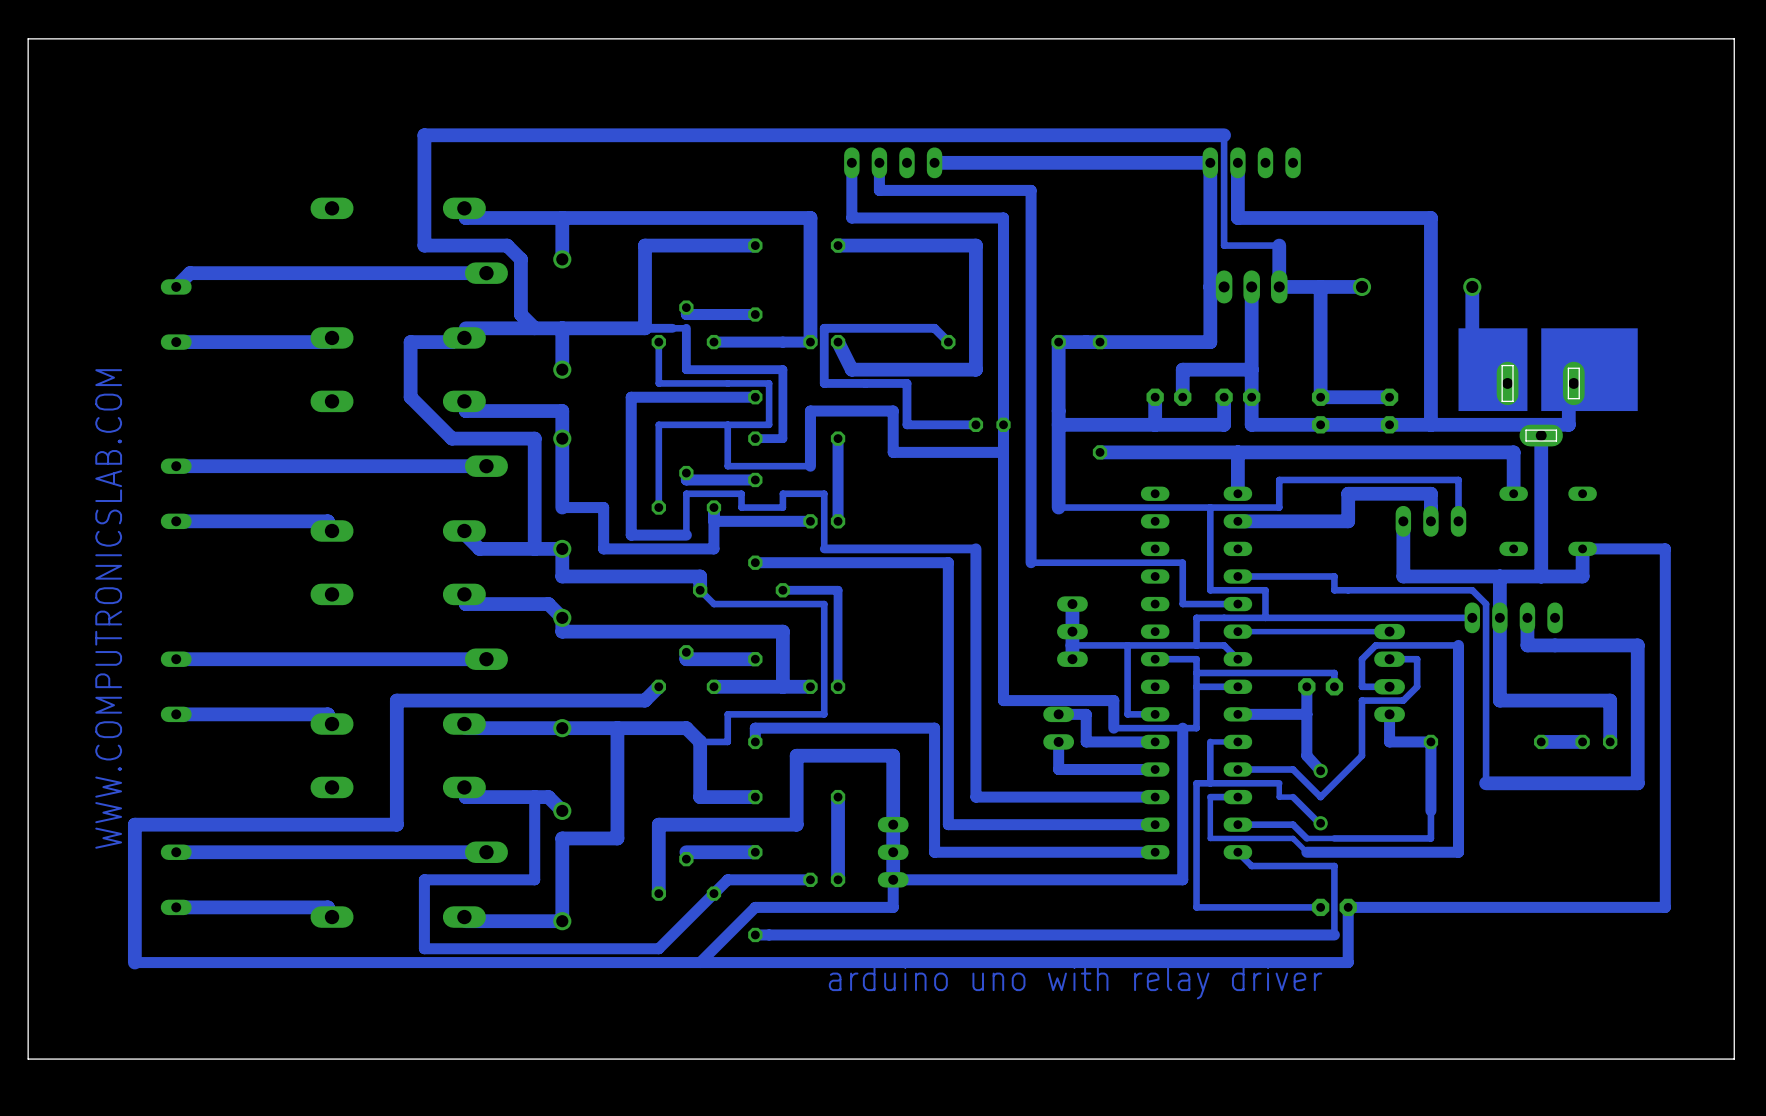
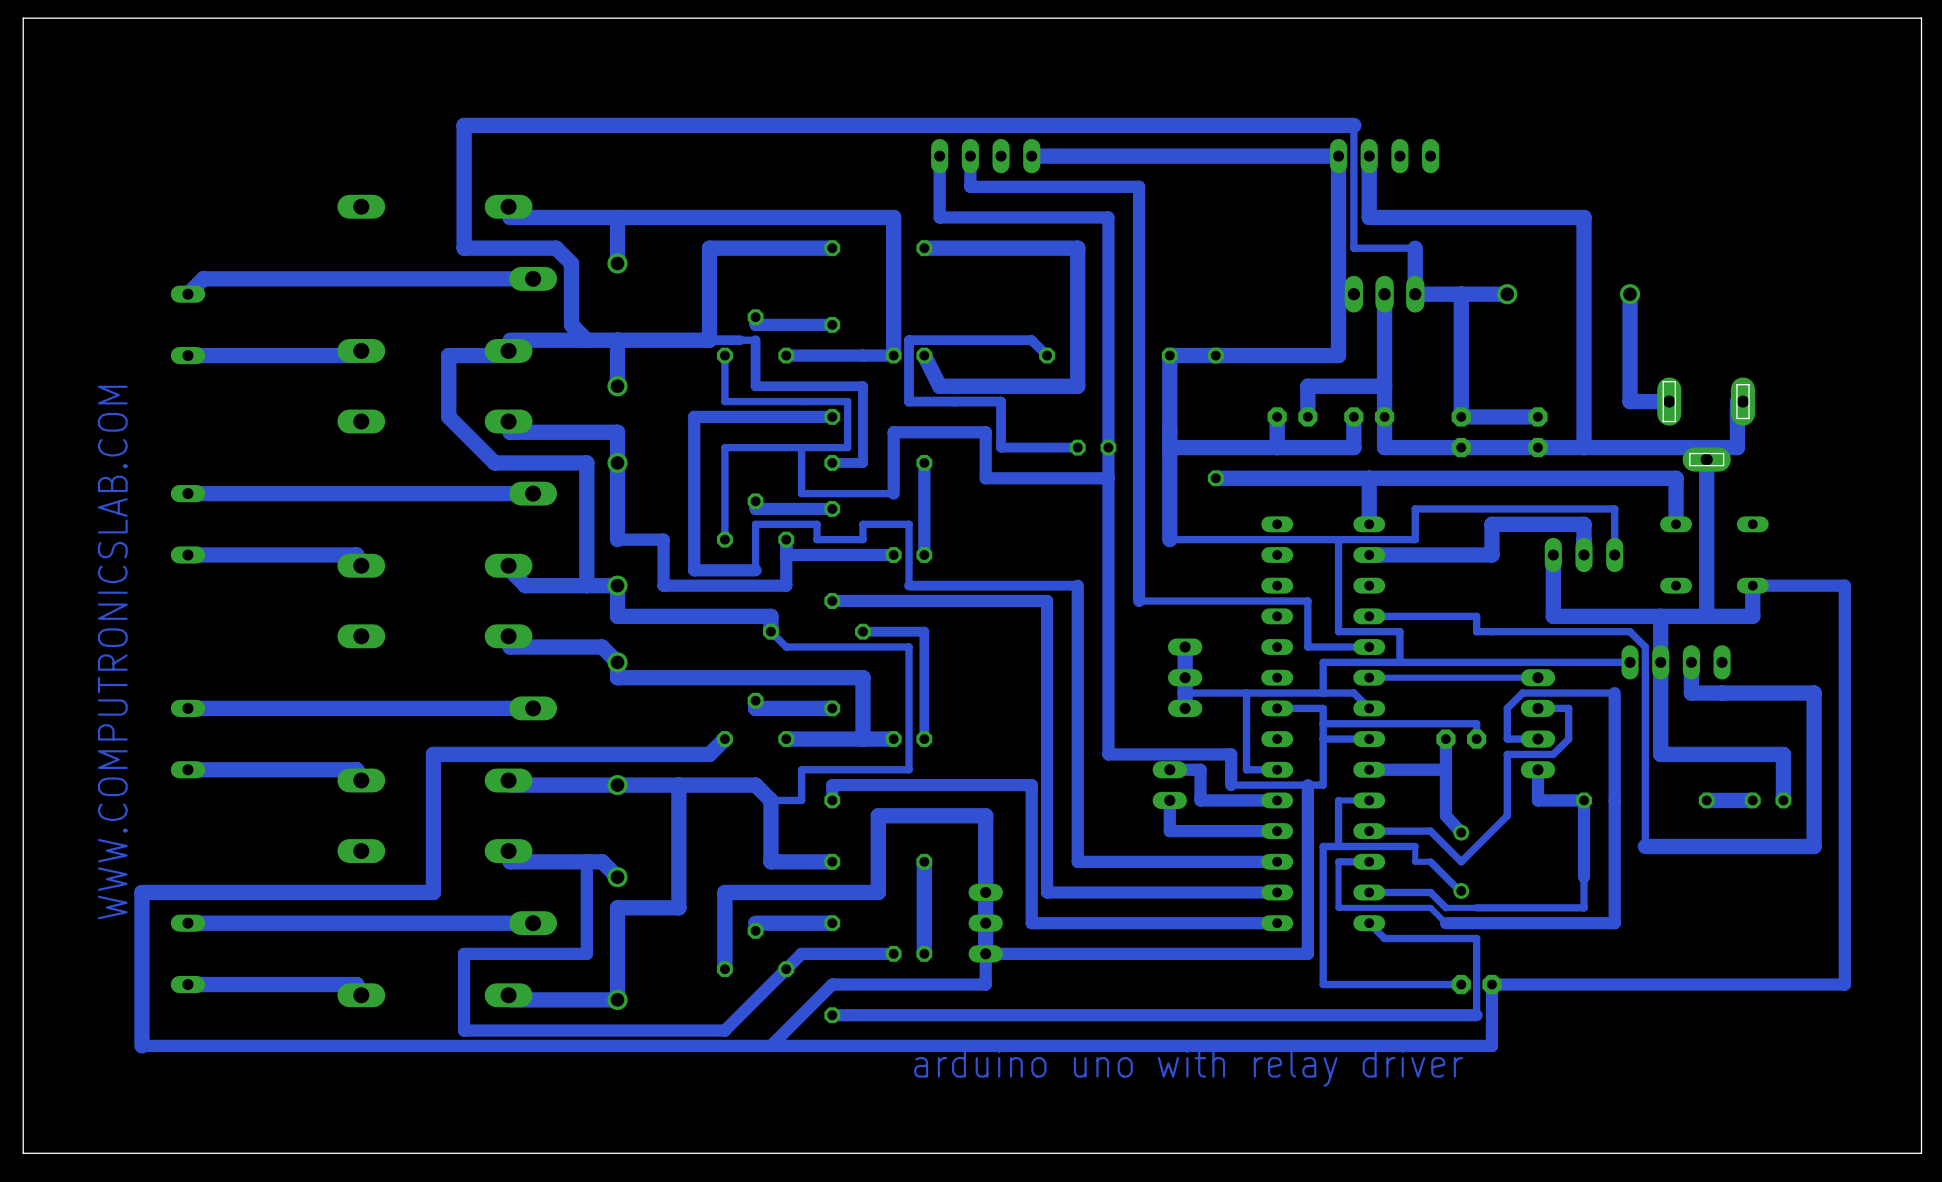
drawing: [1458, 328, 1528, 412] -> none
drawing: [1541, 328, 1638, 412] -> none

